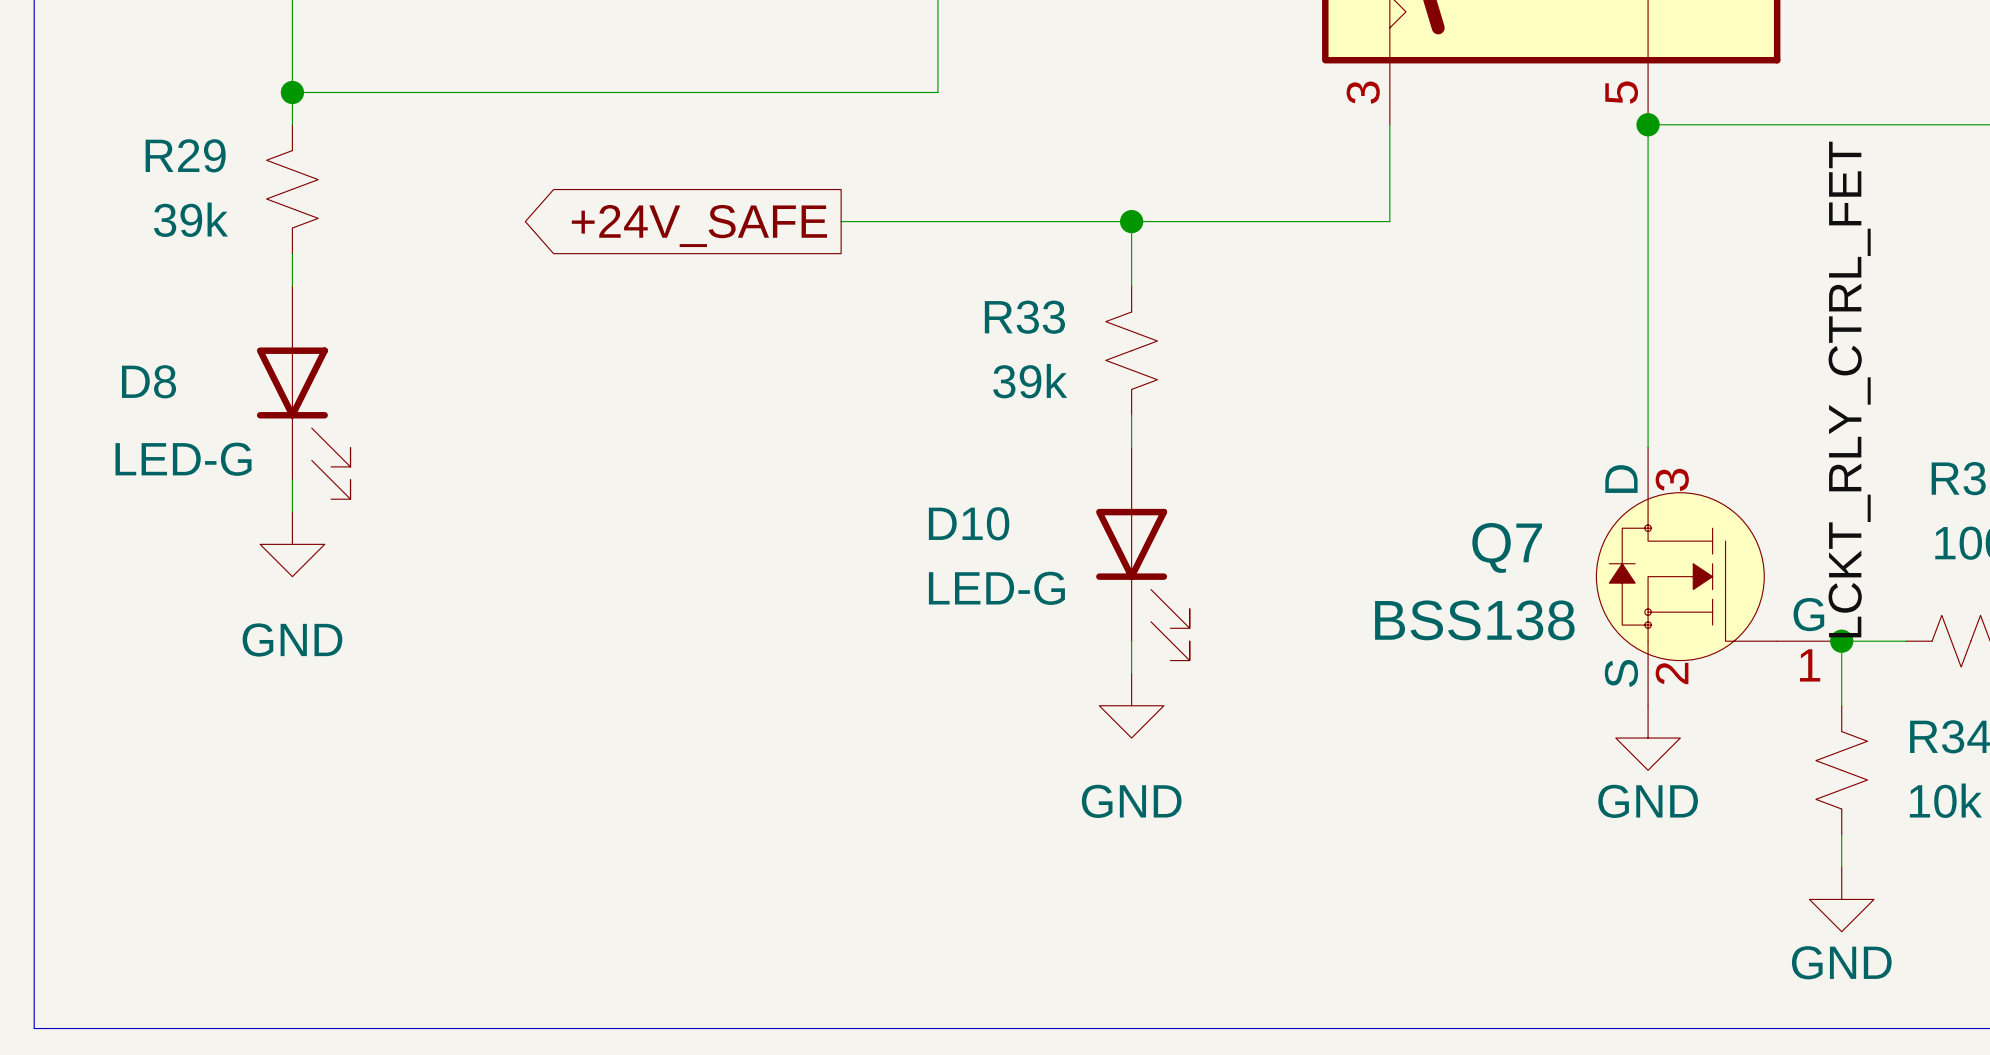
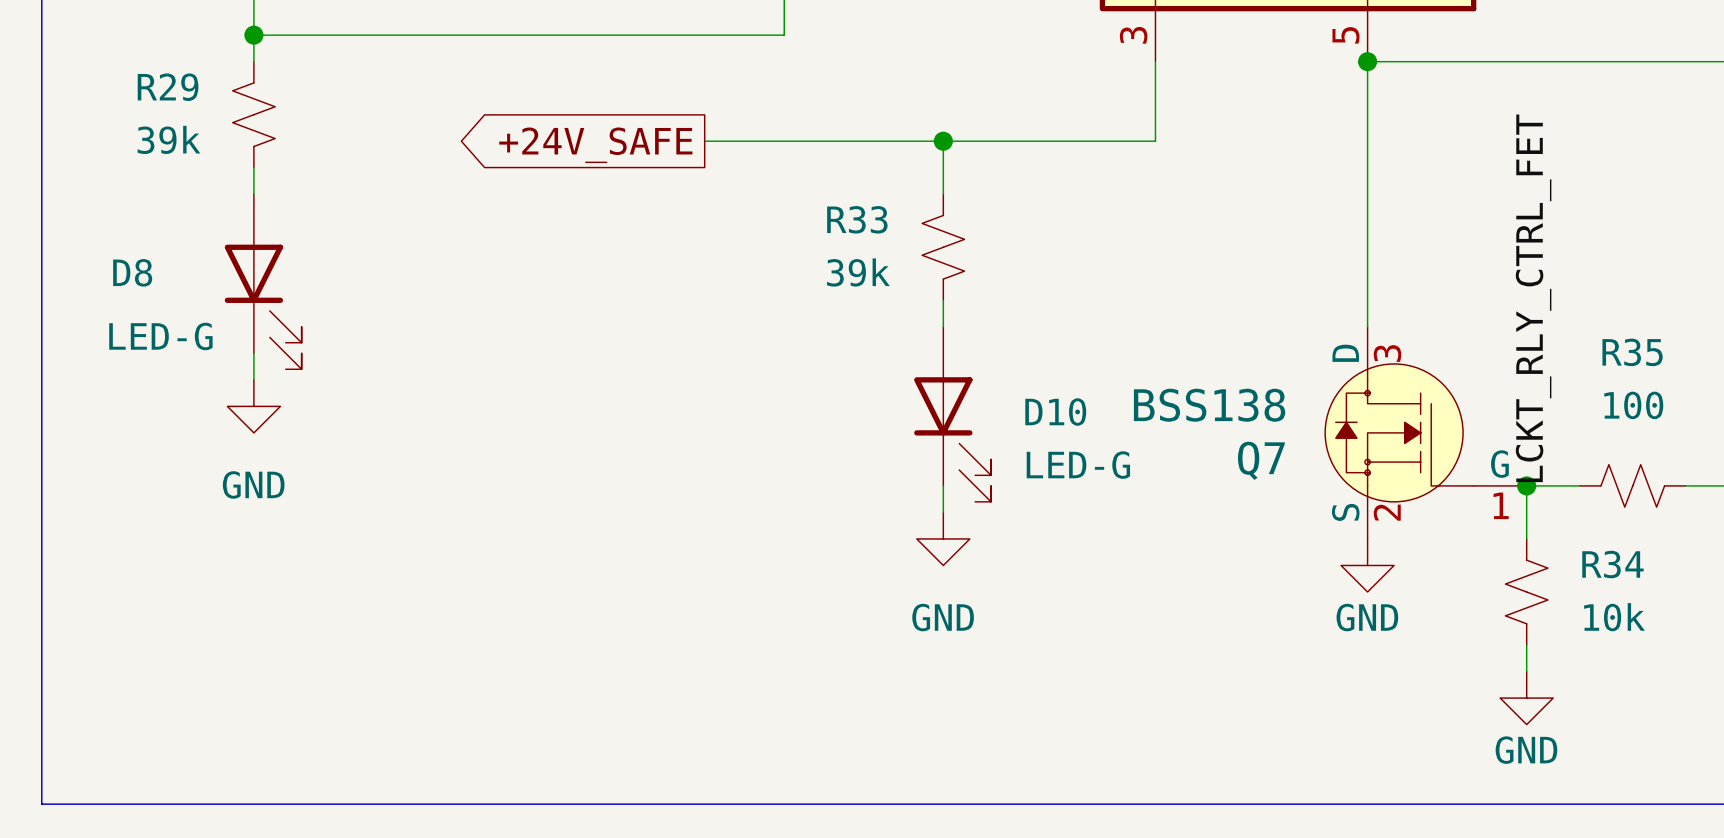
D10 name position: D10 (969, 523) -> D10 (1055, 412)
Q7 name position: Q7 (1507, 547) -> Q7 (1261, 460)
D10 value position: LED-G (996, 588) -> LED-G (1078, 465)
Q7 value position: BSS138 (1474, 620) -> BSS138 (1209, 405)

